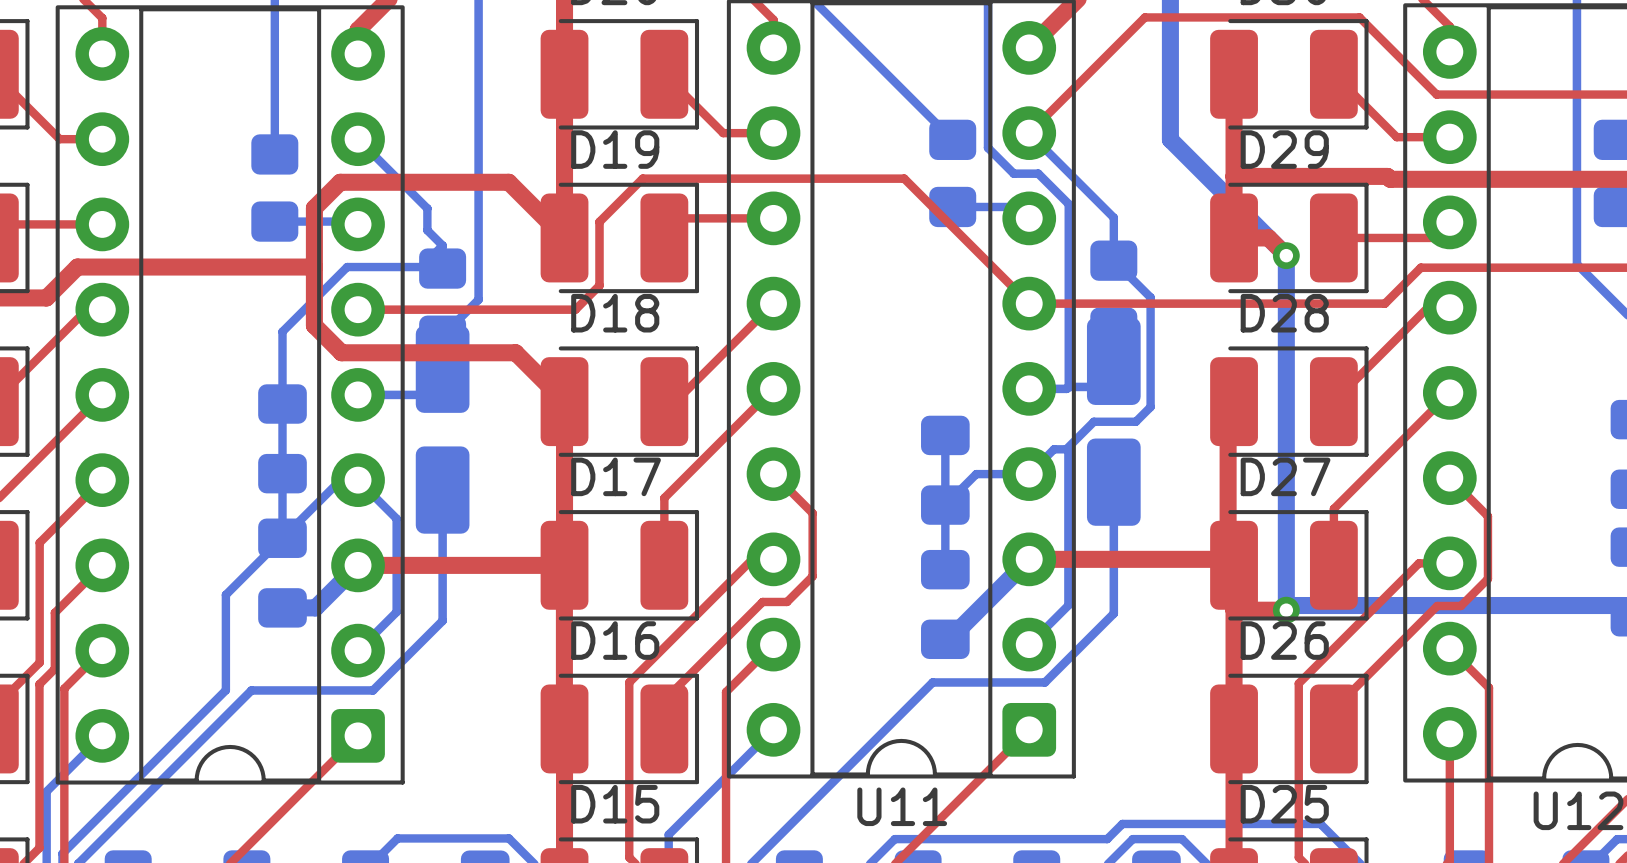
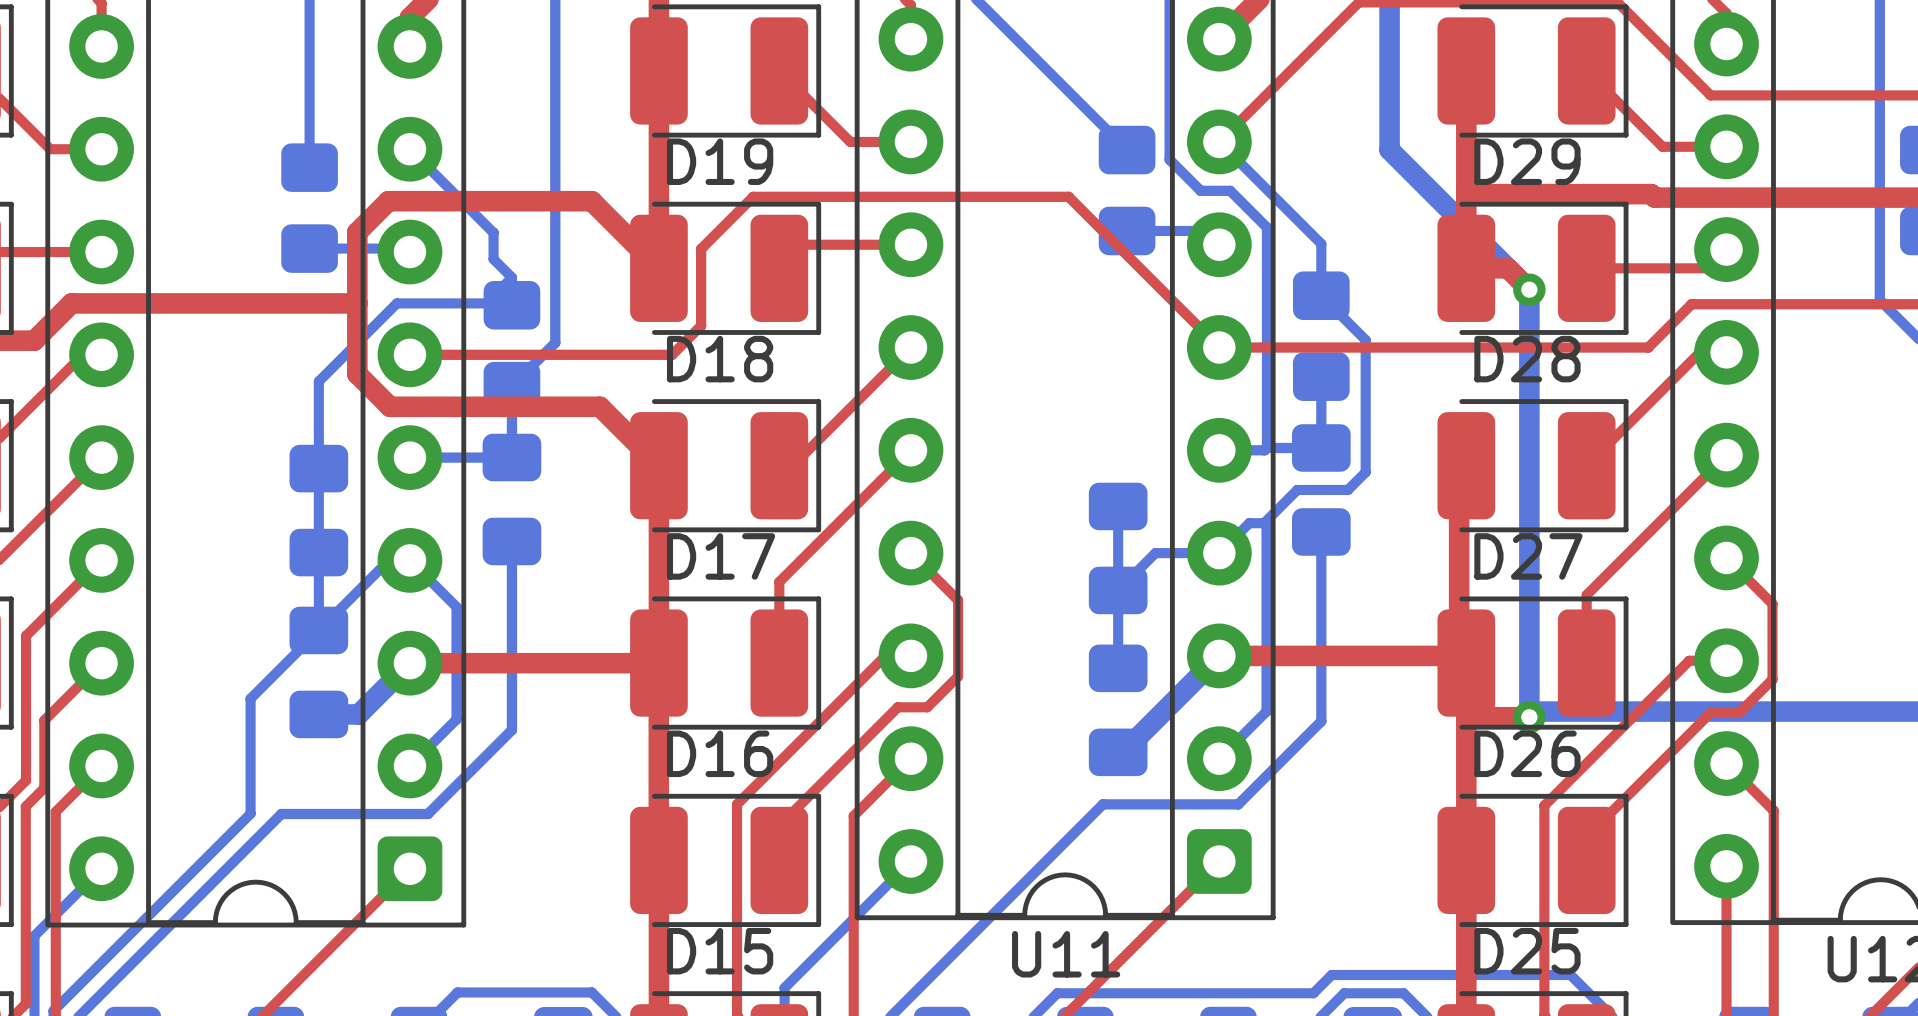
part footprint: [1086, 317, 1141, 526] -> [1291, 424, 1351, 556]
part footprint: [415, 325, 470, 534] -> [482, 433, 542, 566]

